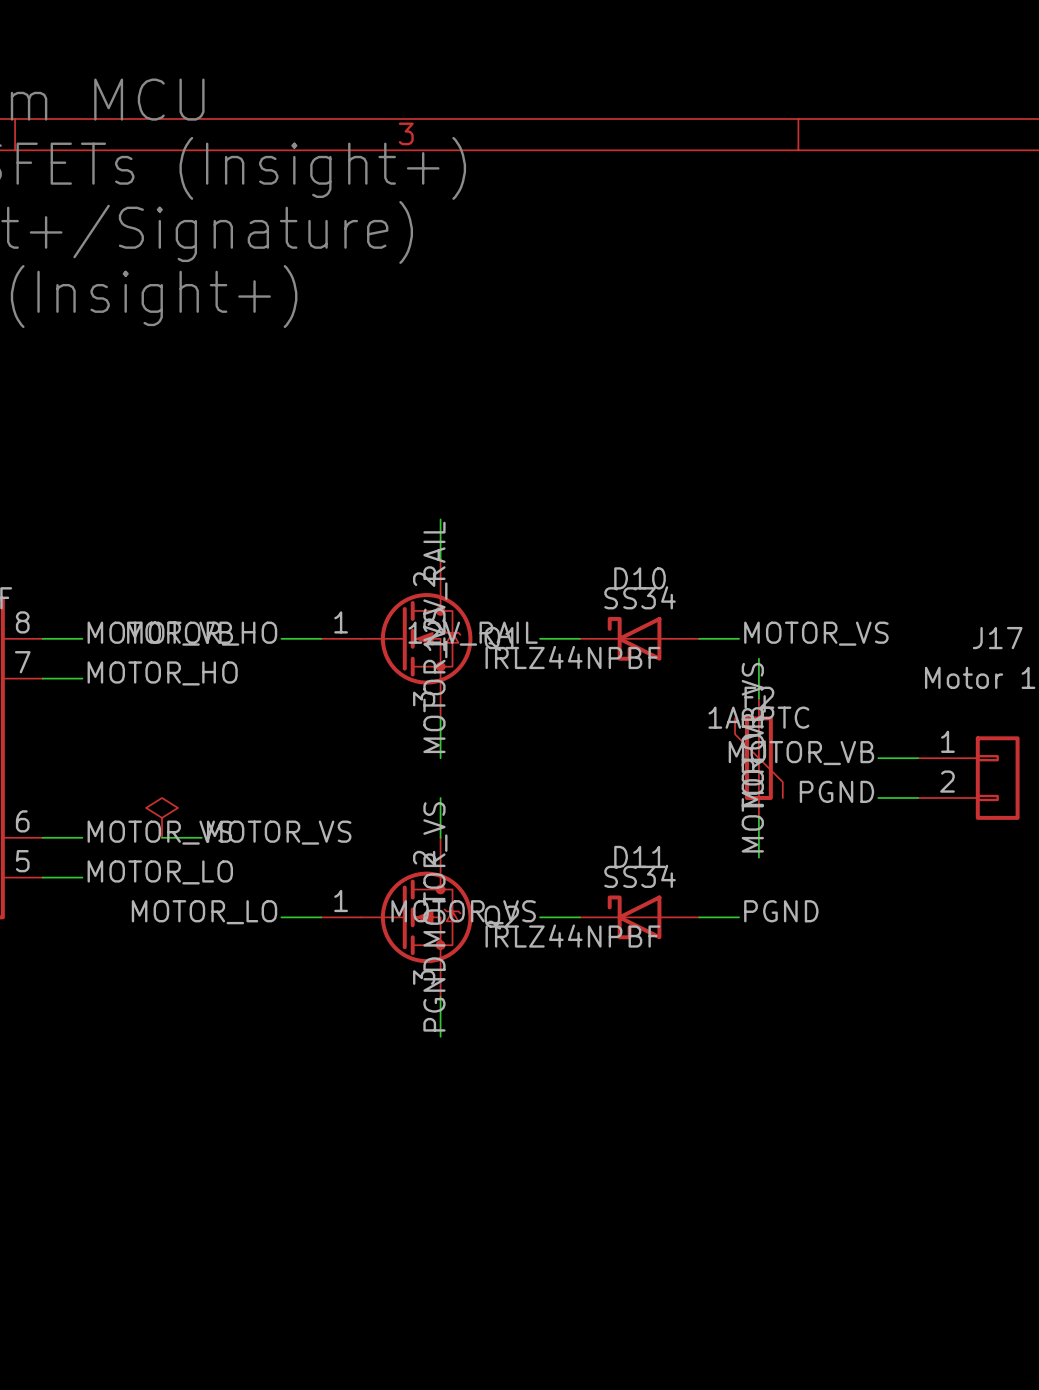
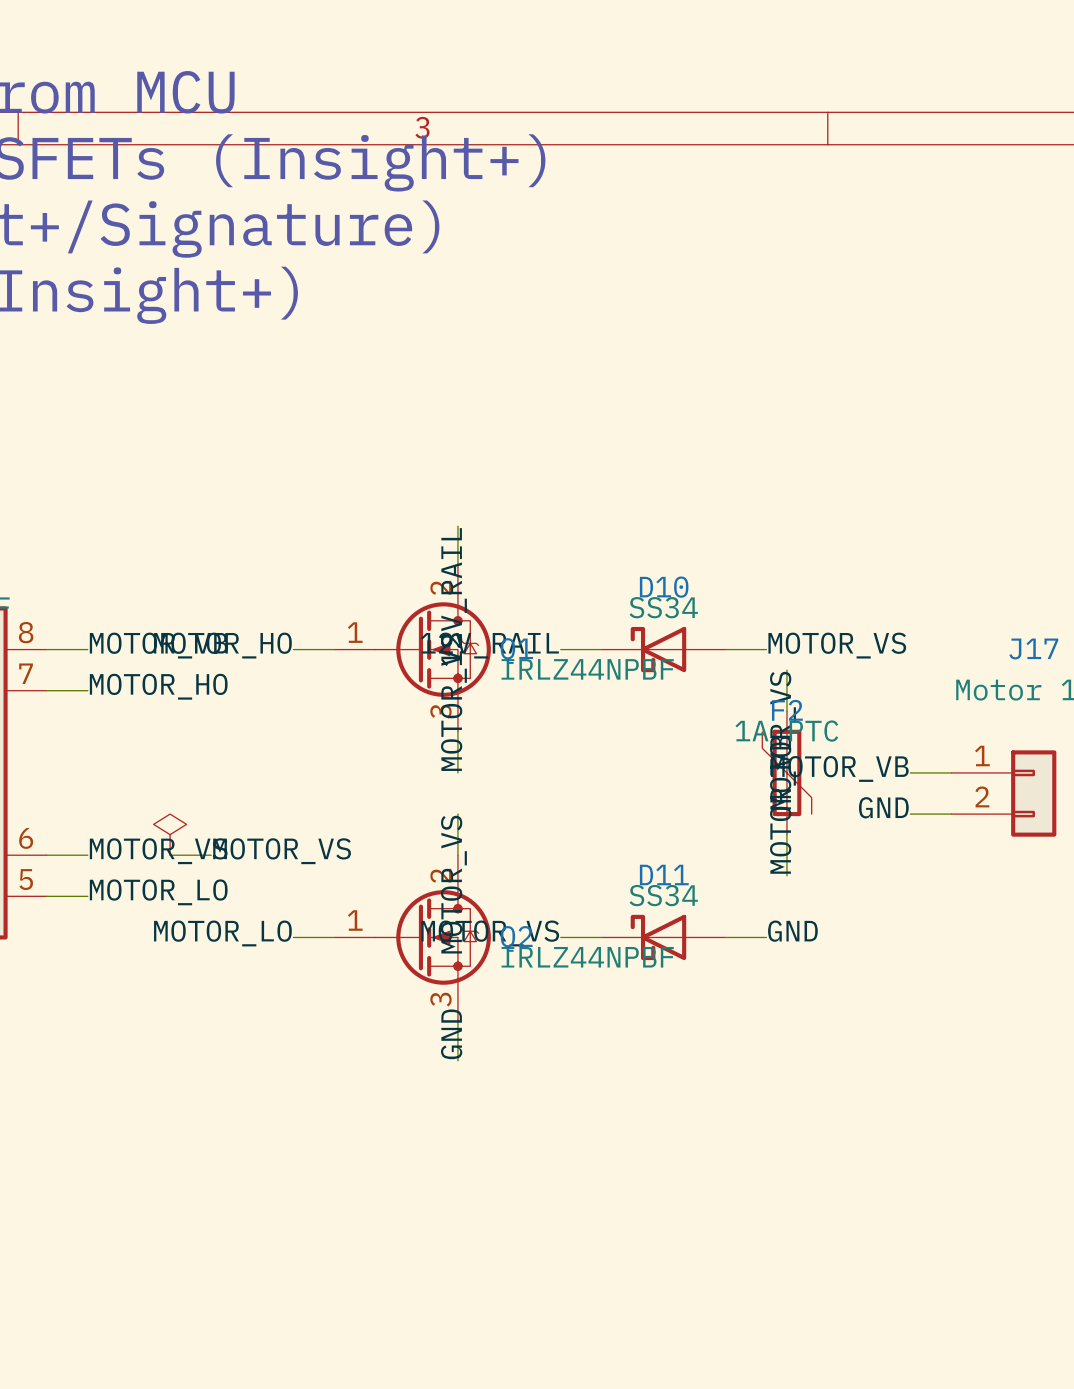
label: PGND (836, 791) -> GND (883, 807)
label: PGND (781, 911) -> GND (792, 931)
label: PGND (434, 994) -> GND (451, 1034)

